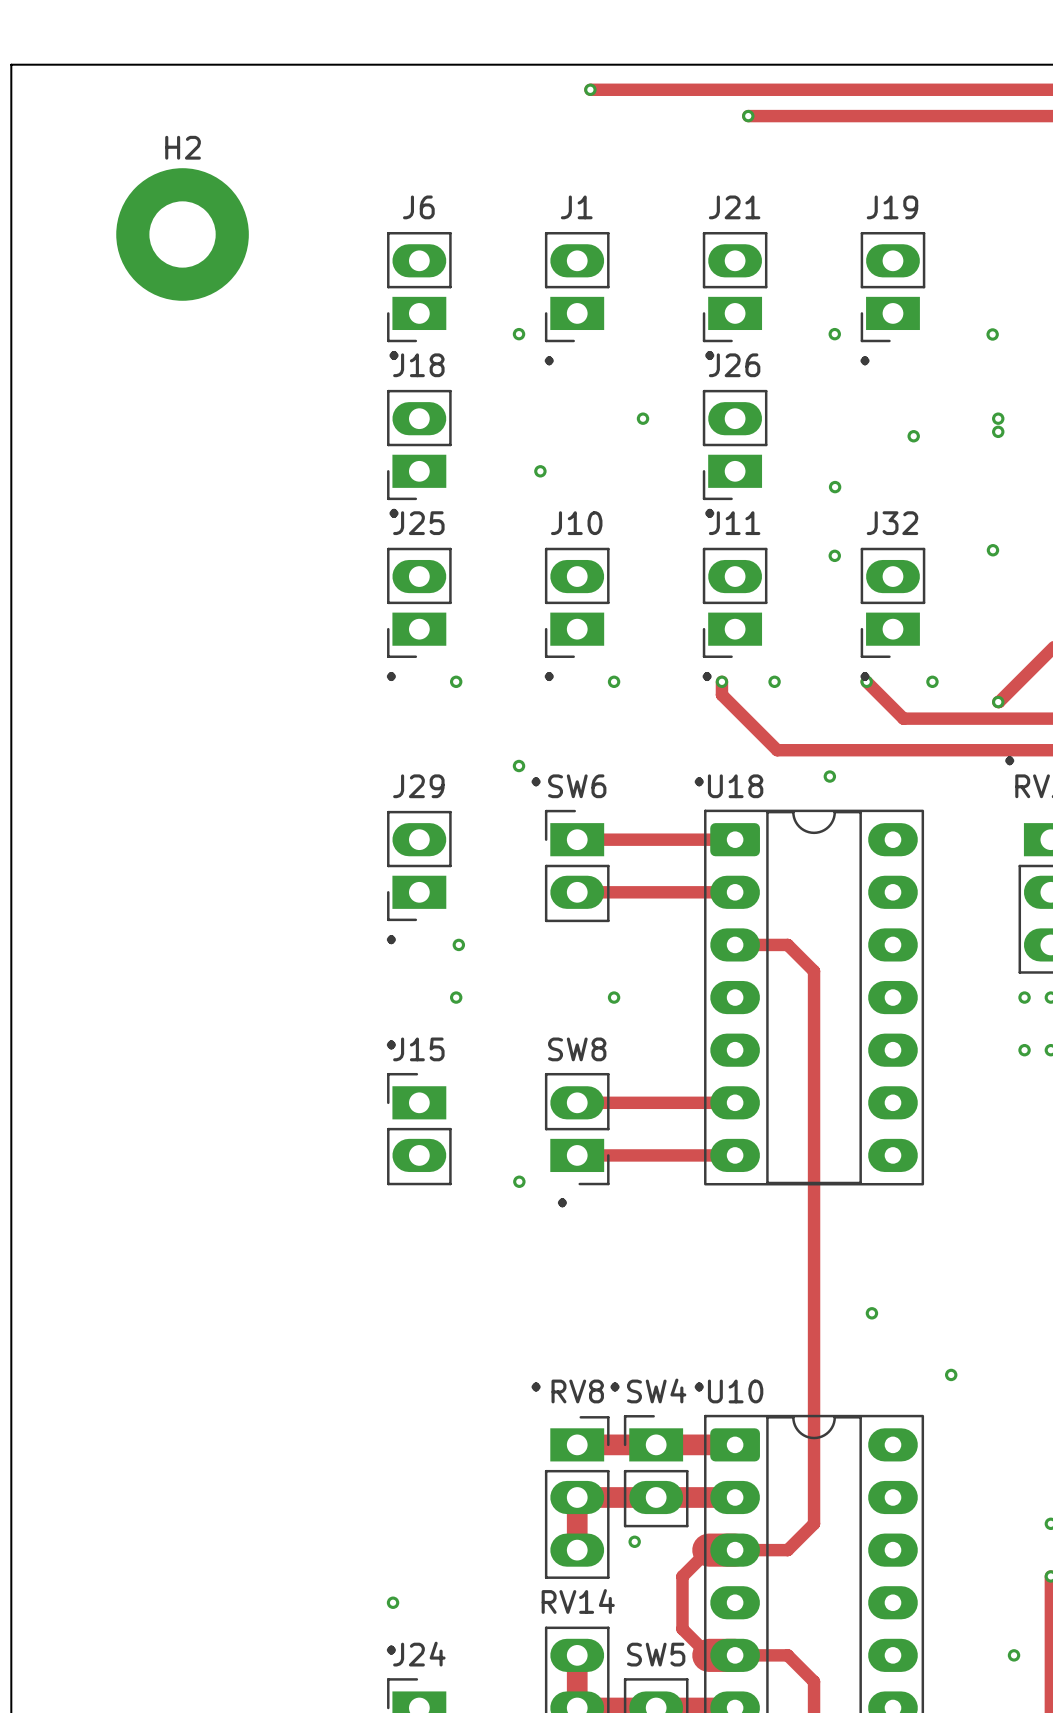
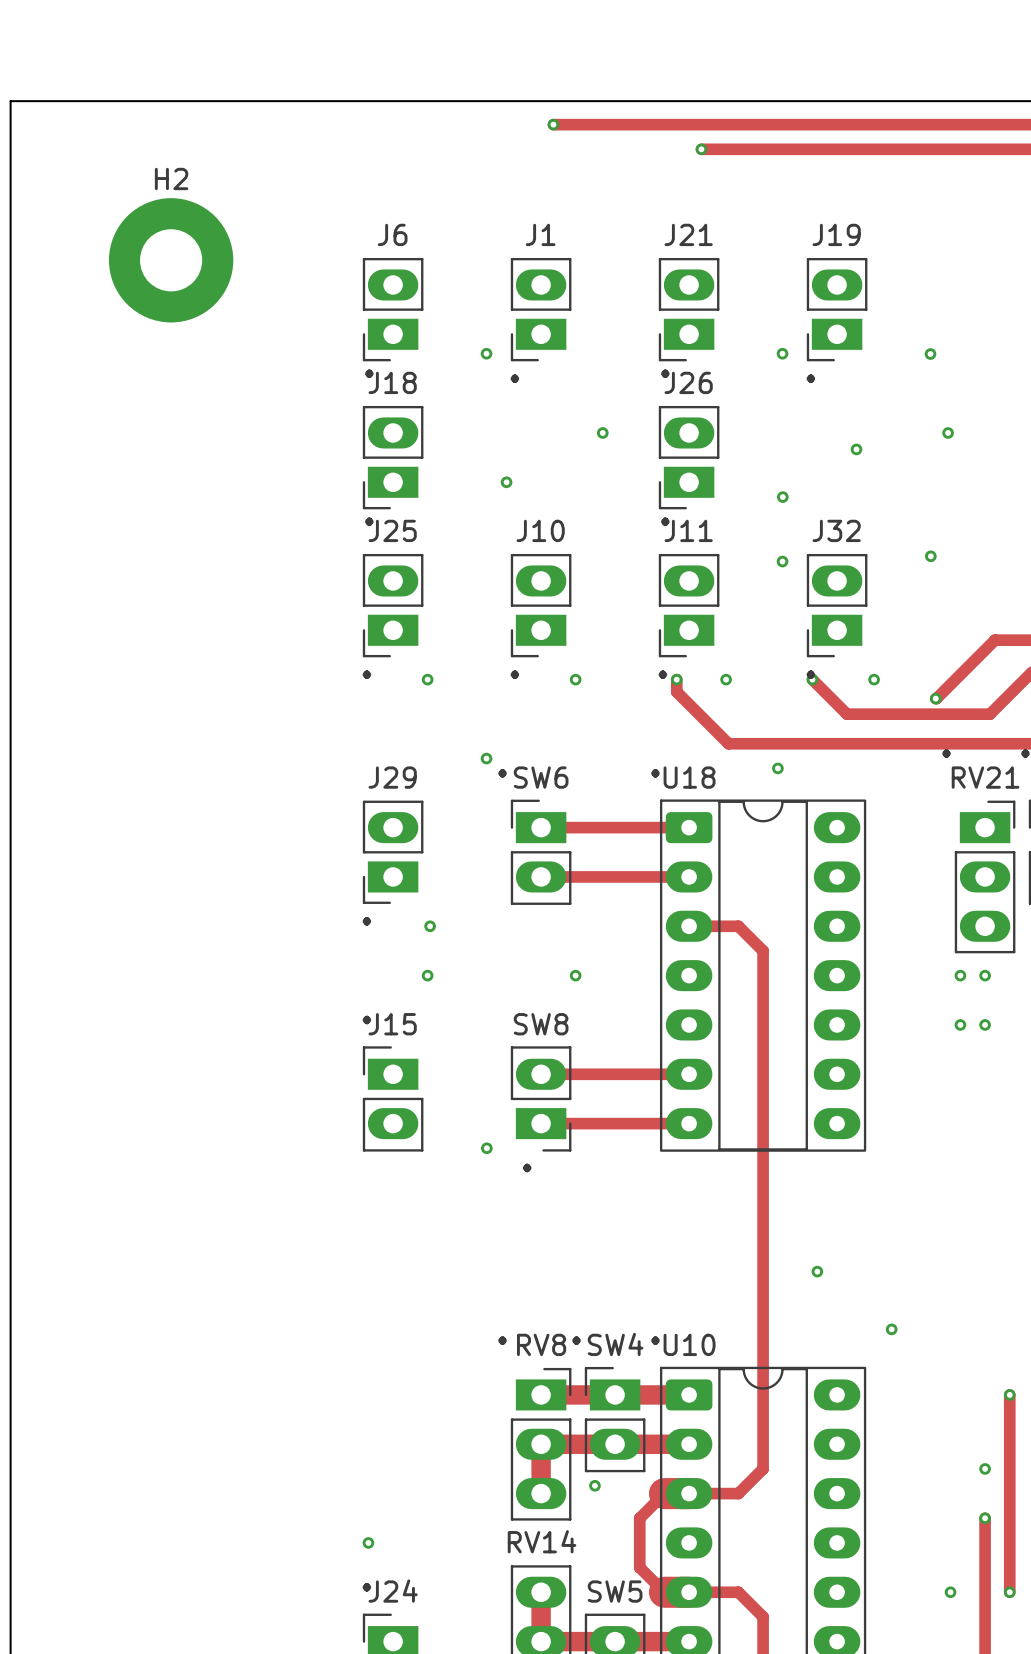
via: (998, 418) -> none
via: none -> (948, 432)
via: (998, 431) -> none

